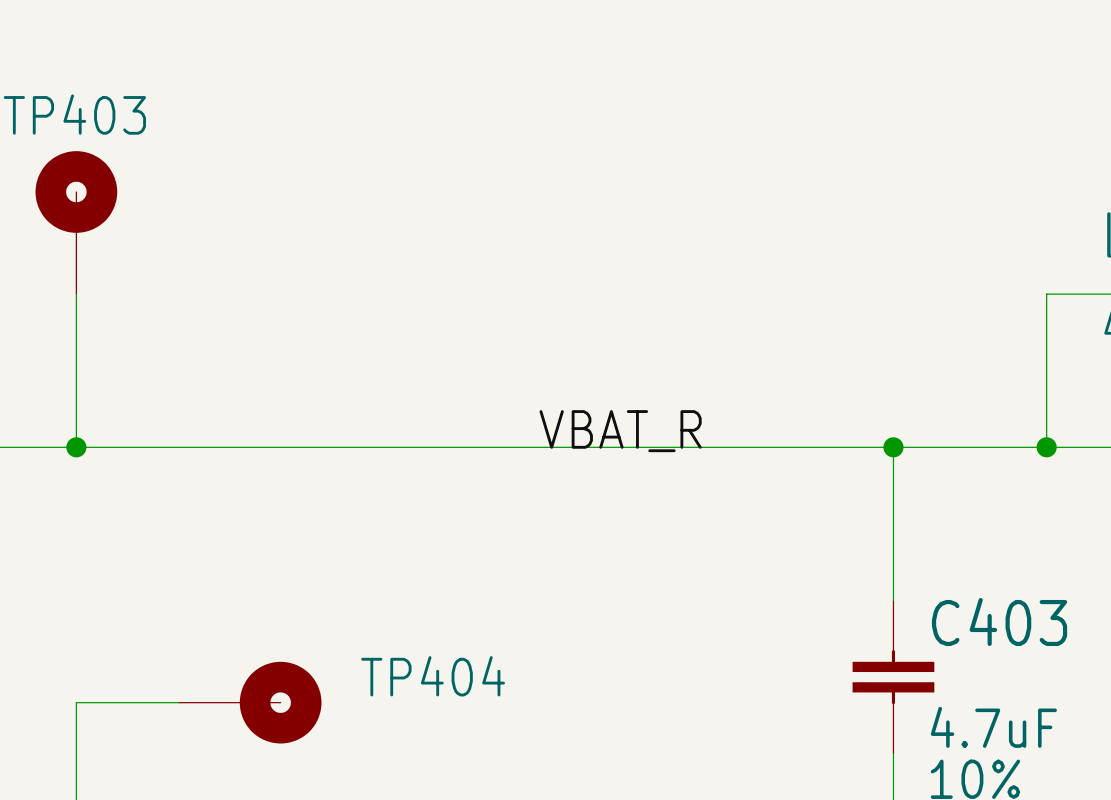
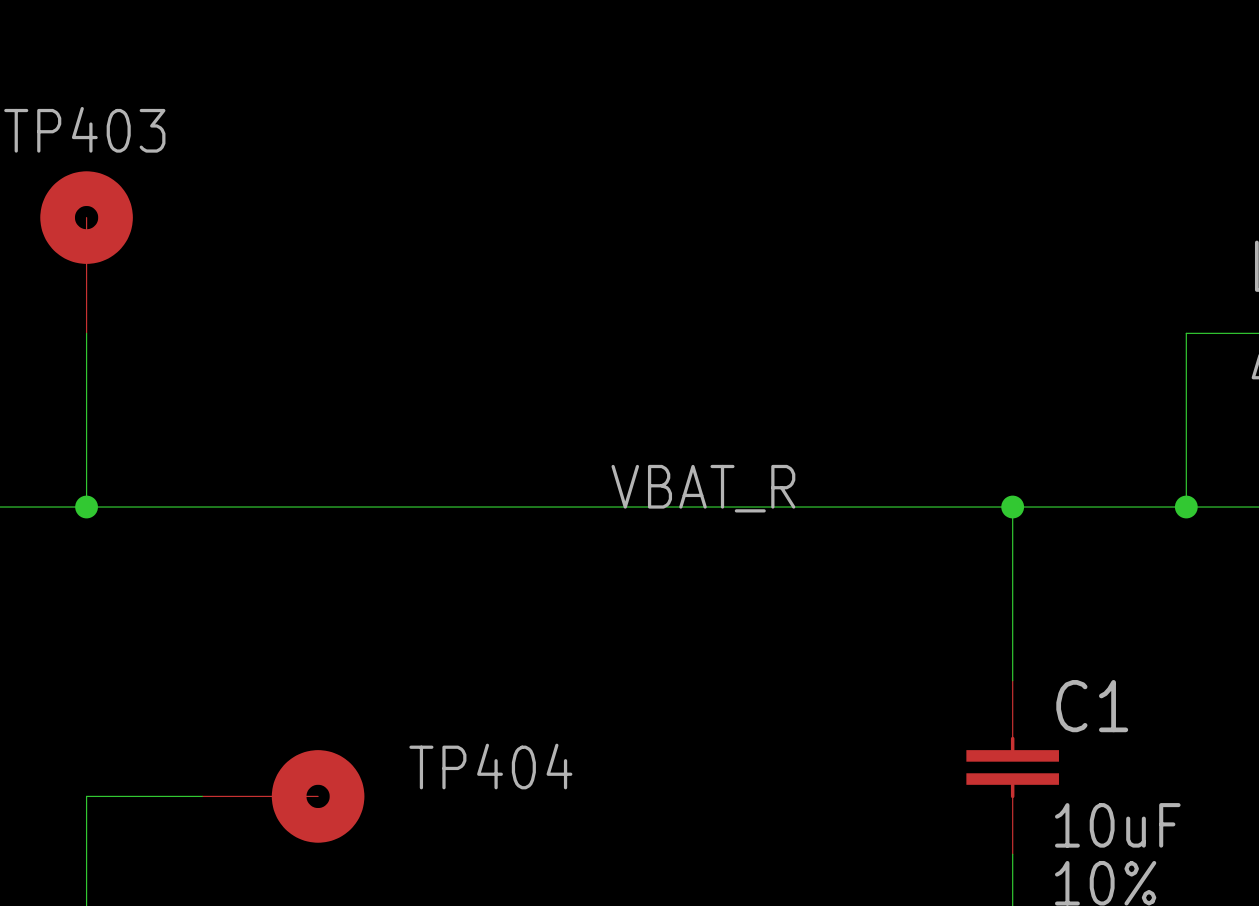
C403 name: C403 (999, 622) -> C1 (1092, 706)
C403 value: 4.7uF (993, 727) -> 10uF (1117, 825)

